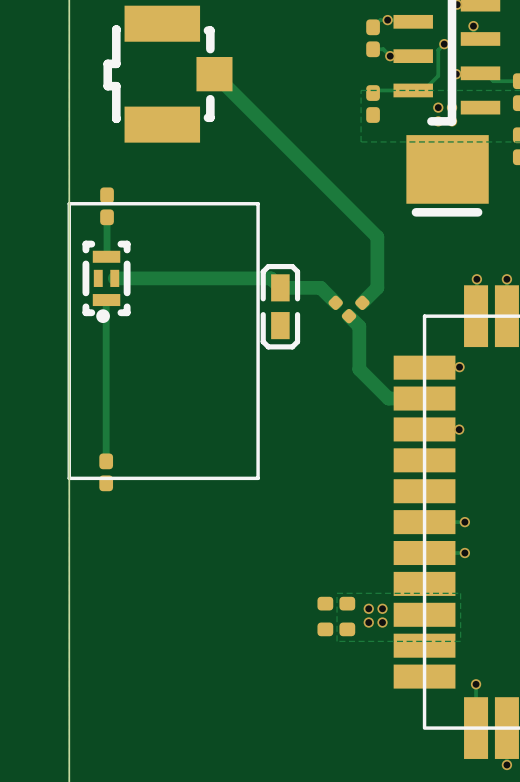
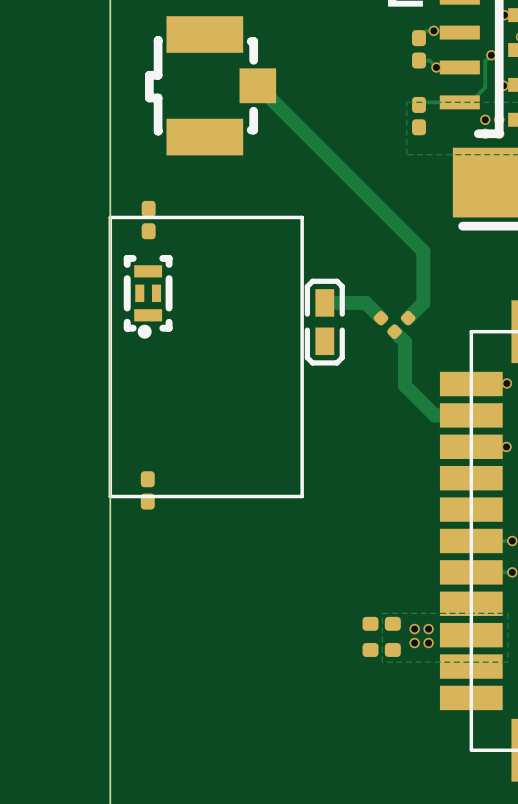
track: (107, 217) (106, 256) -> none
track: (114, 278) (270, 278) (280, 287) -> none
track: (106, 300) (106, 461) -> none

